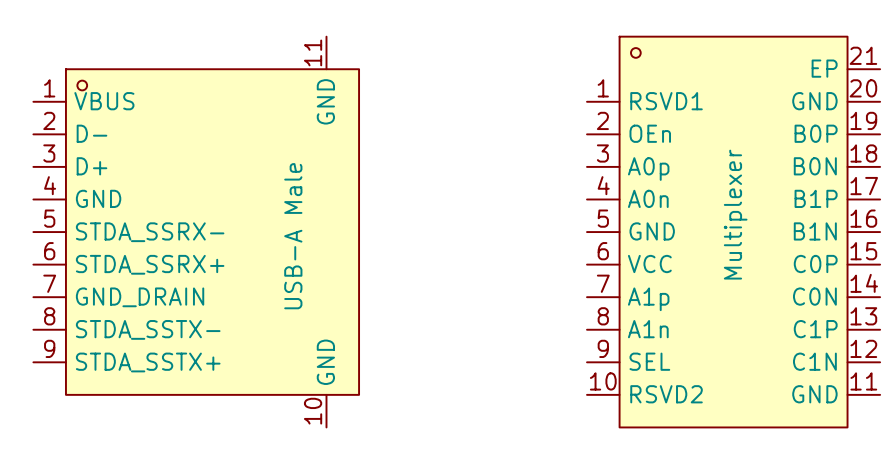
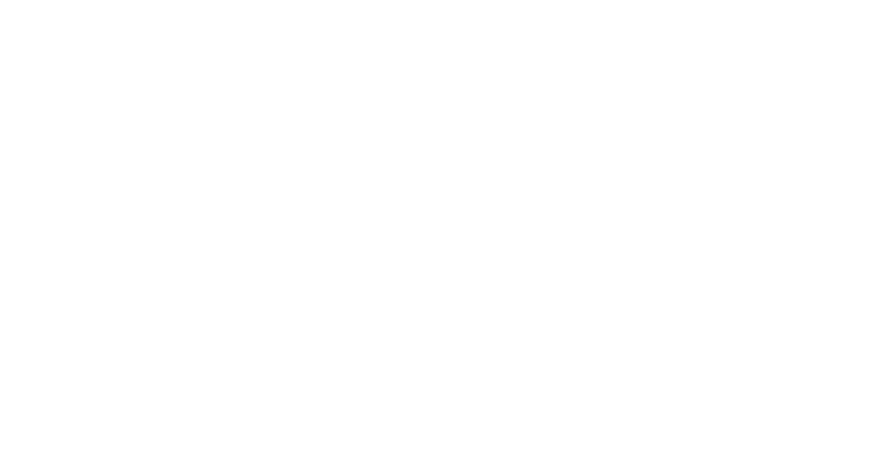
part: USB-A Male (196, 232) -> none
part: Multiplexer (733, 232) -> none

